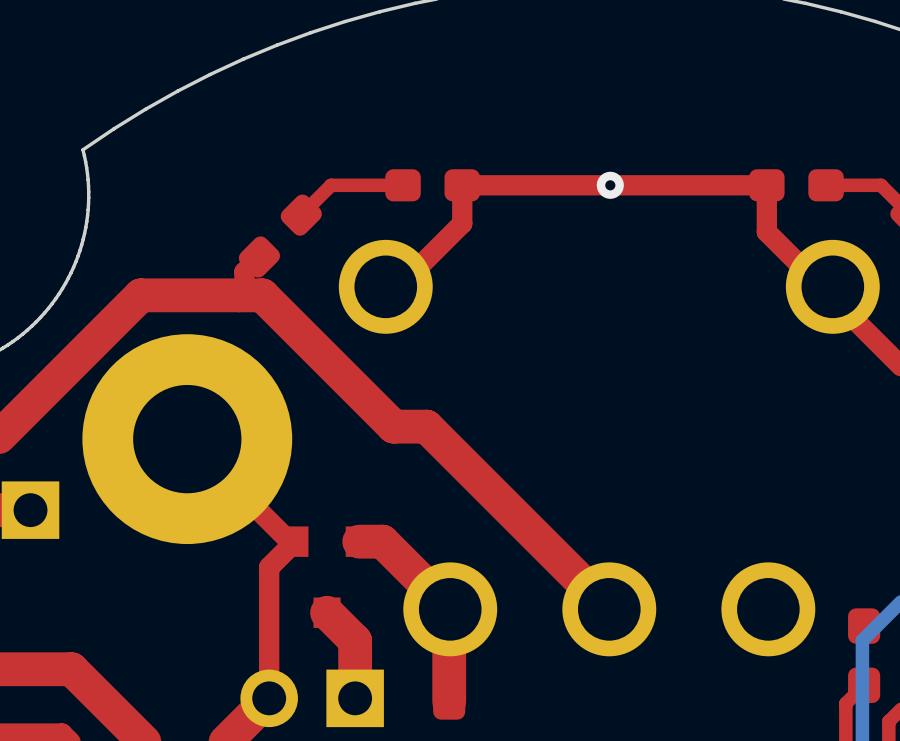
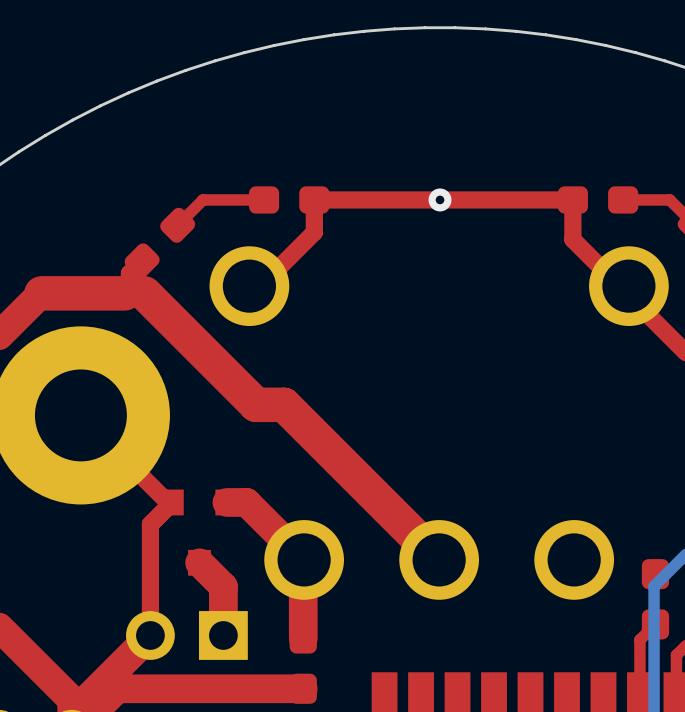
top track width: thin (239, 295) (140, 295) -> thick (124, 293) (41, 293)
top track width: thin (262, 295) (393, 426) (426, 426) (609, 609) -> thick (144, 293) (256, 404) (284, 404) (439, 559)

